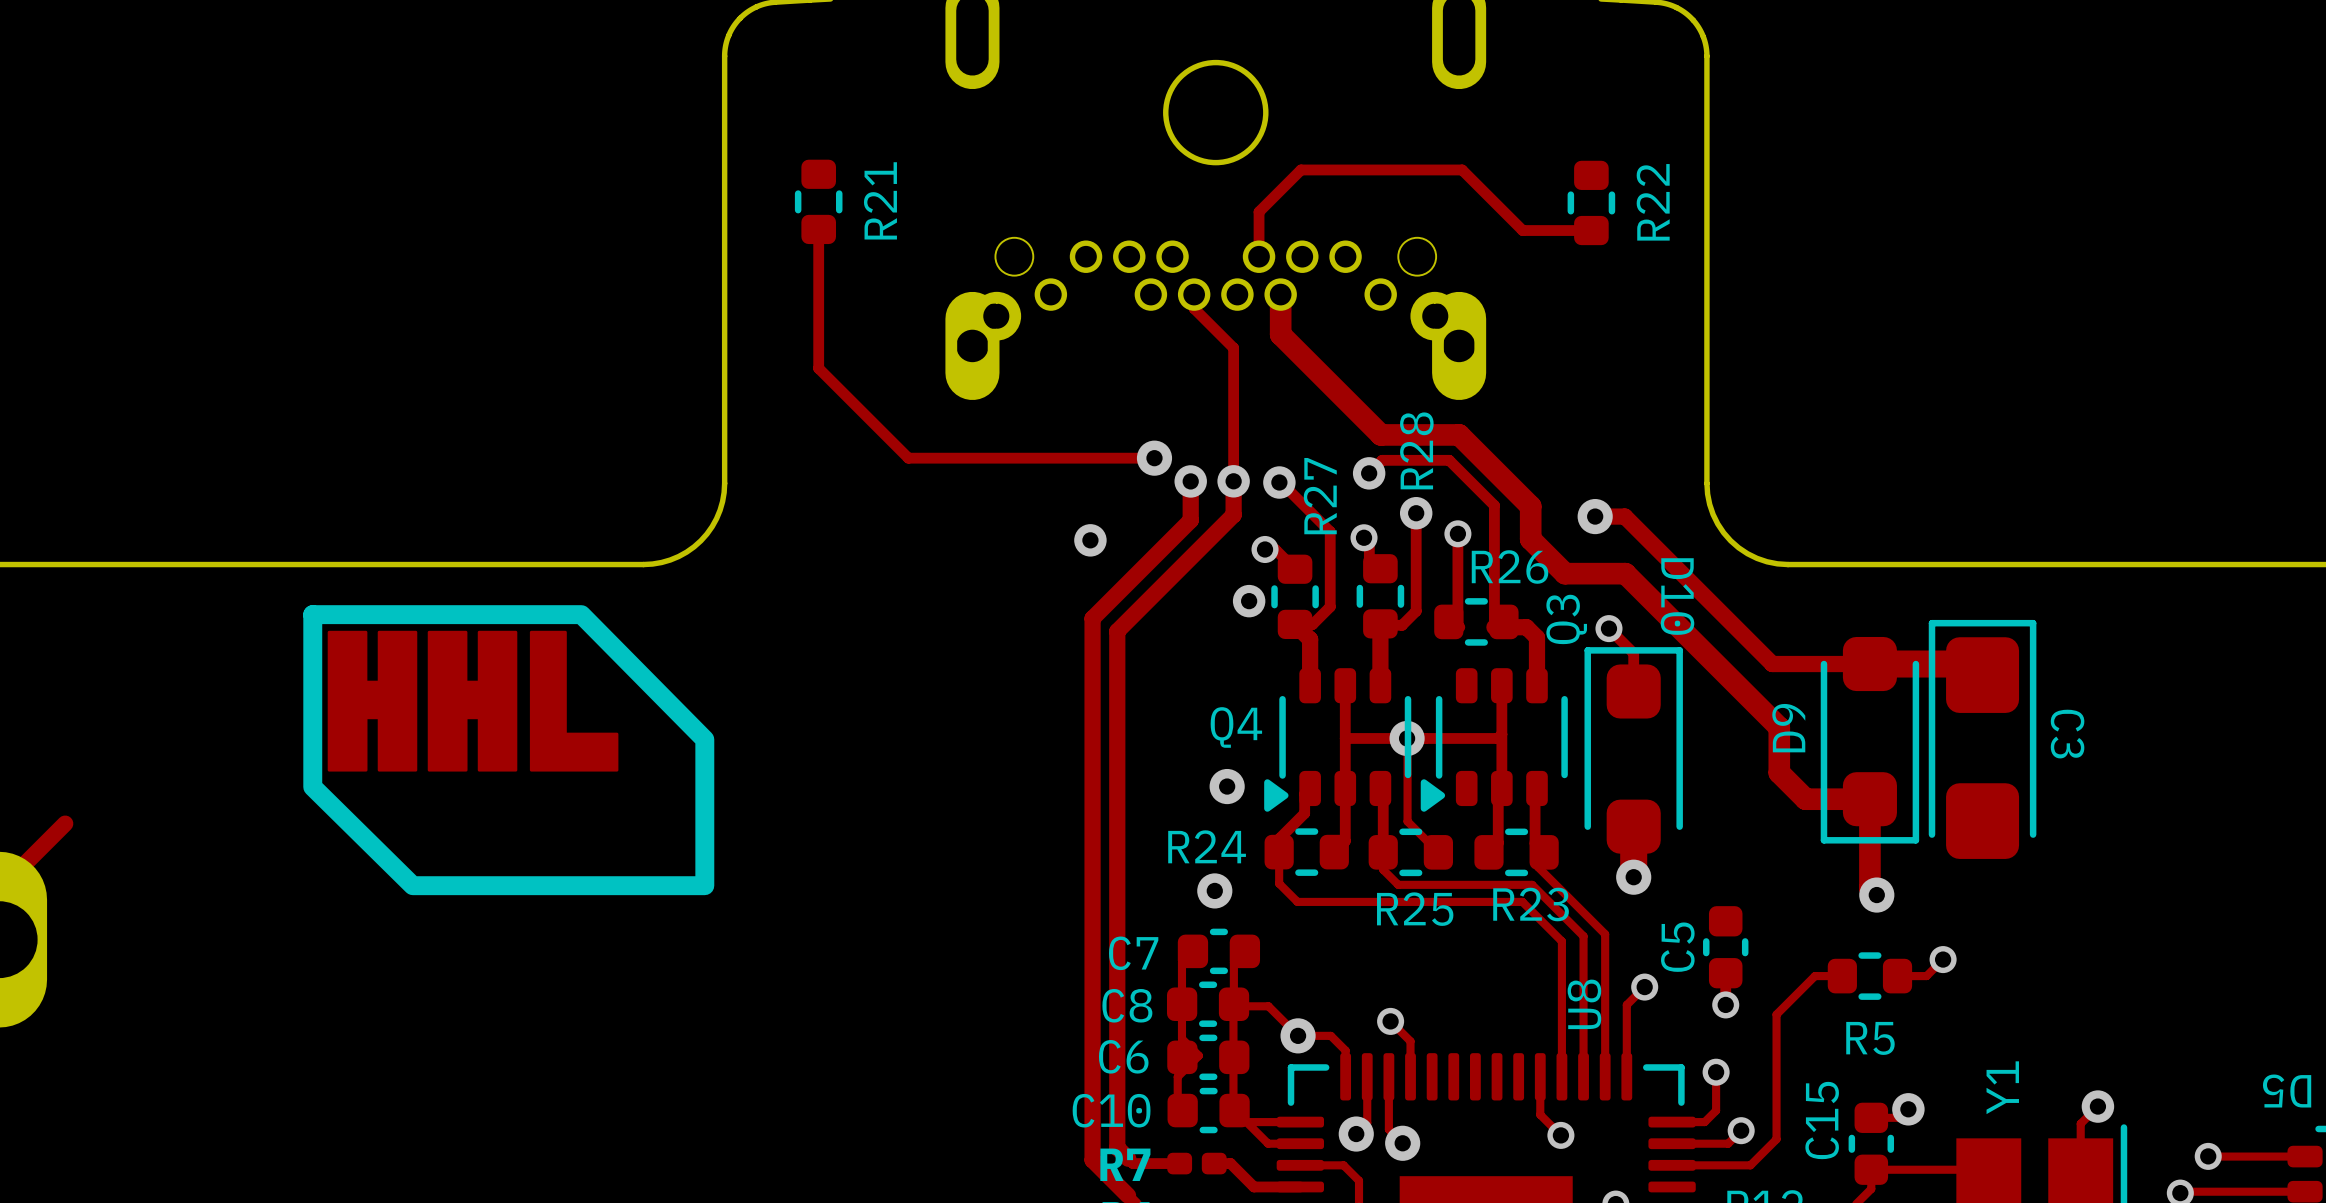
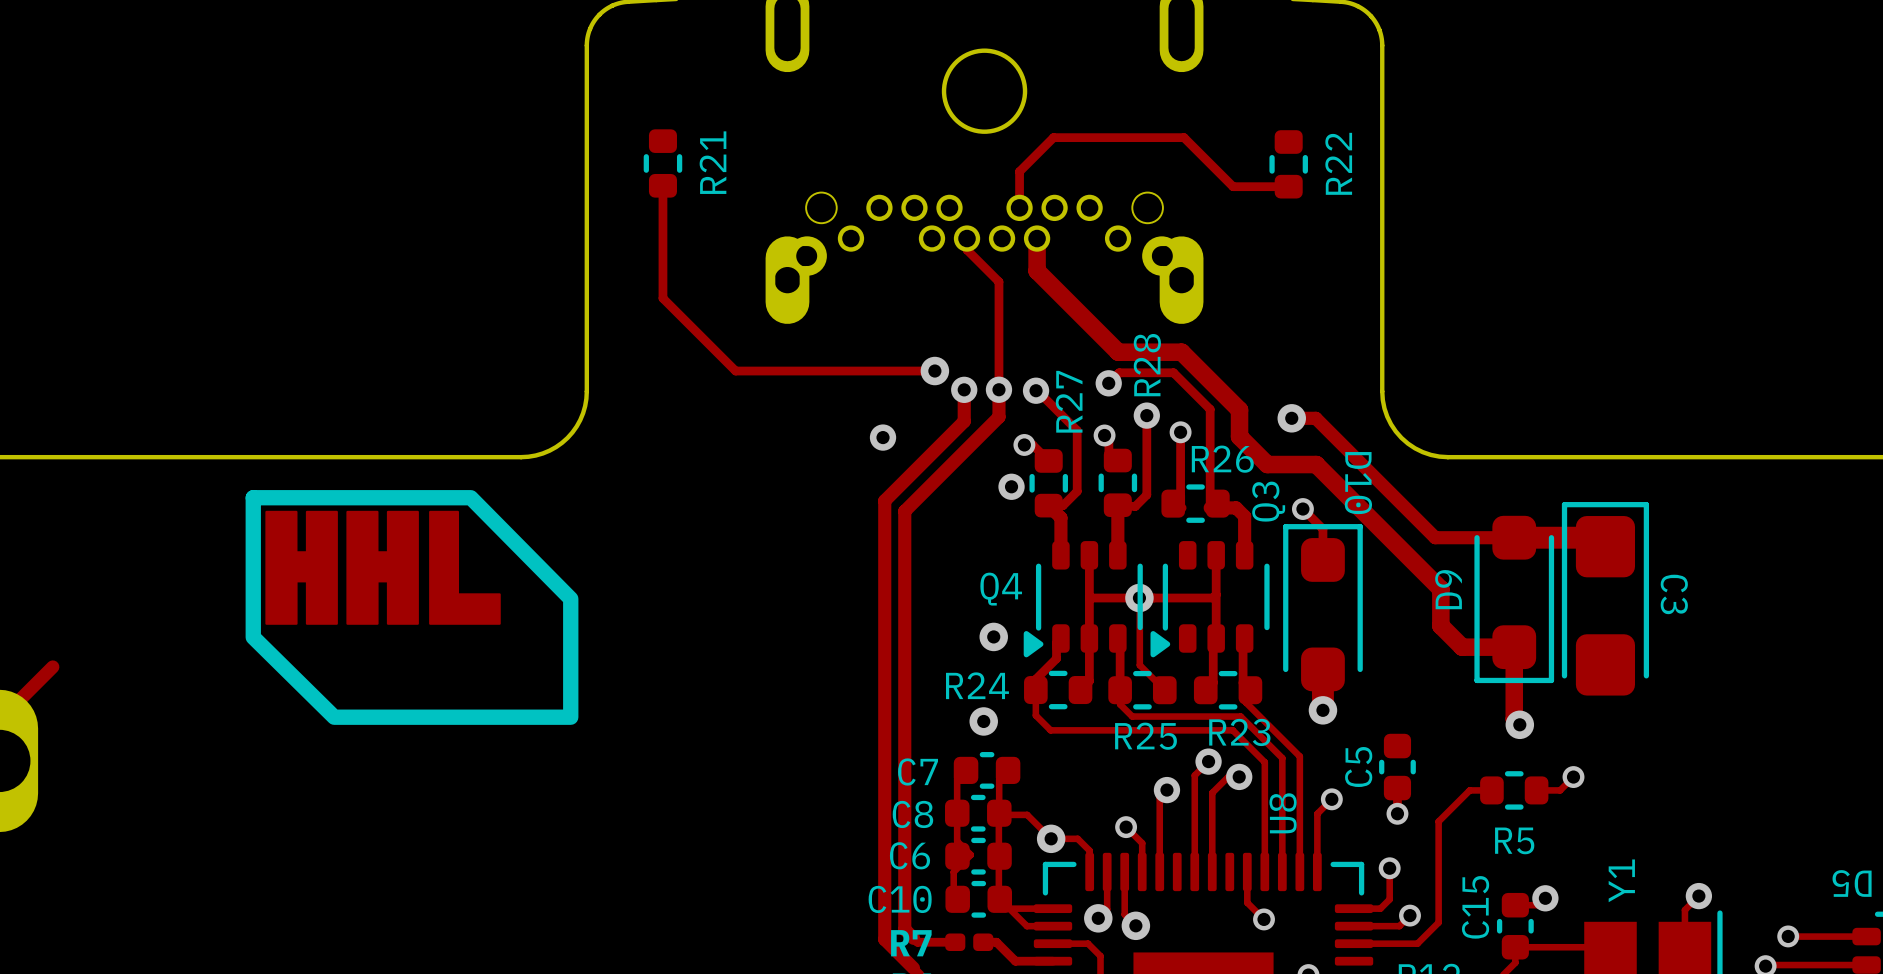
track: none -> (1208, 761) (1194, 775) (1194, 871)
via: none -> (1208, 761)
track: none -> (1239, 776) (1228, 776) (1212, 792) (1212, 871)
via: none -> (1239, 776)
track: none -> (1166, 790) (1159, 797) (1159, 871)
via: none -> (1166, 790)

